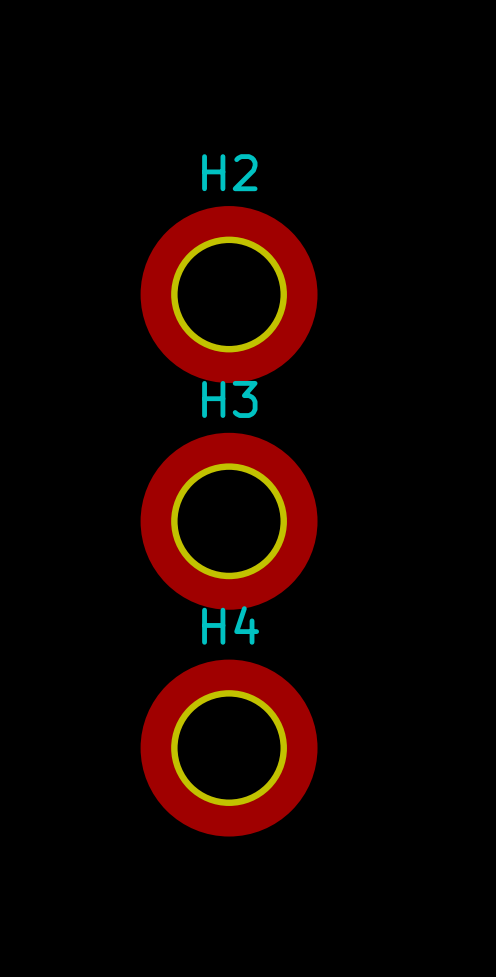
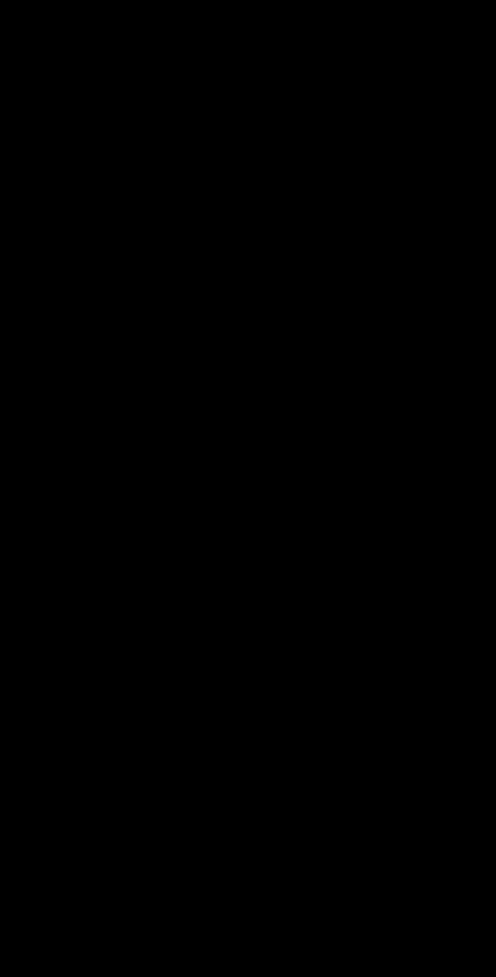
H2: (229, 294) -> none
H3: (229, 521) -> none
H4: (229, 748) -> none

